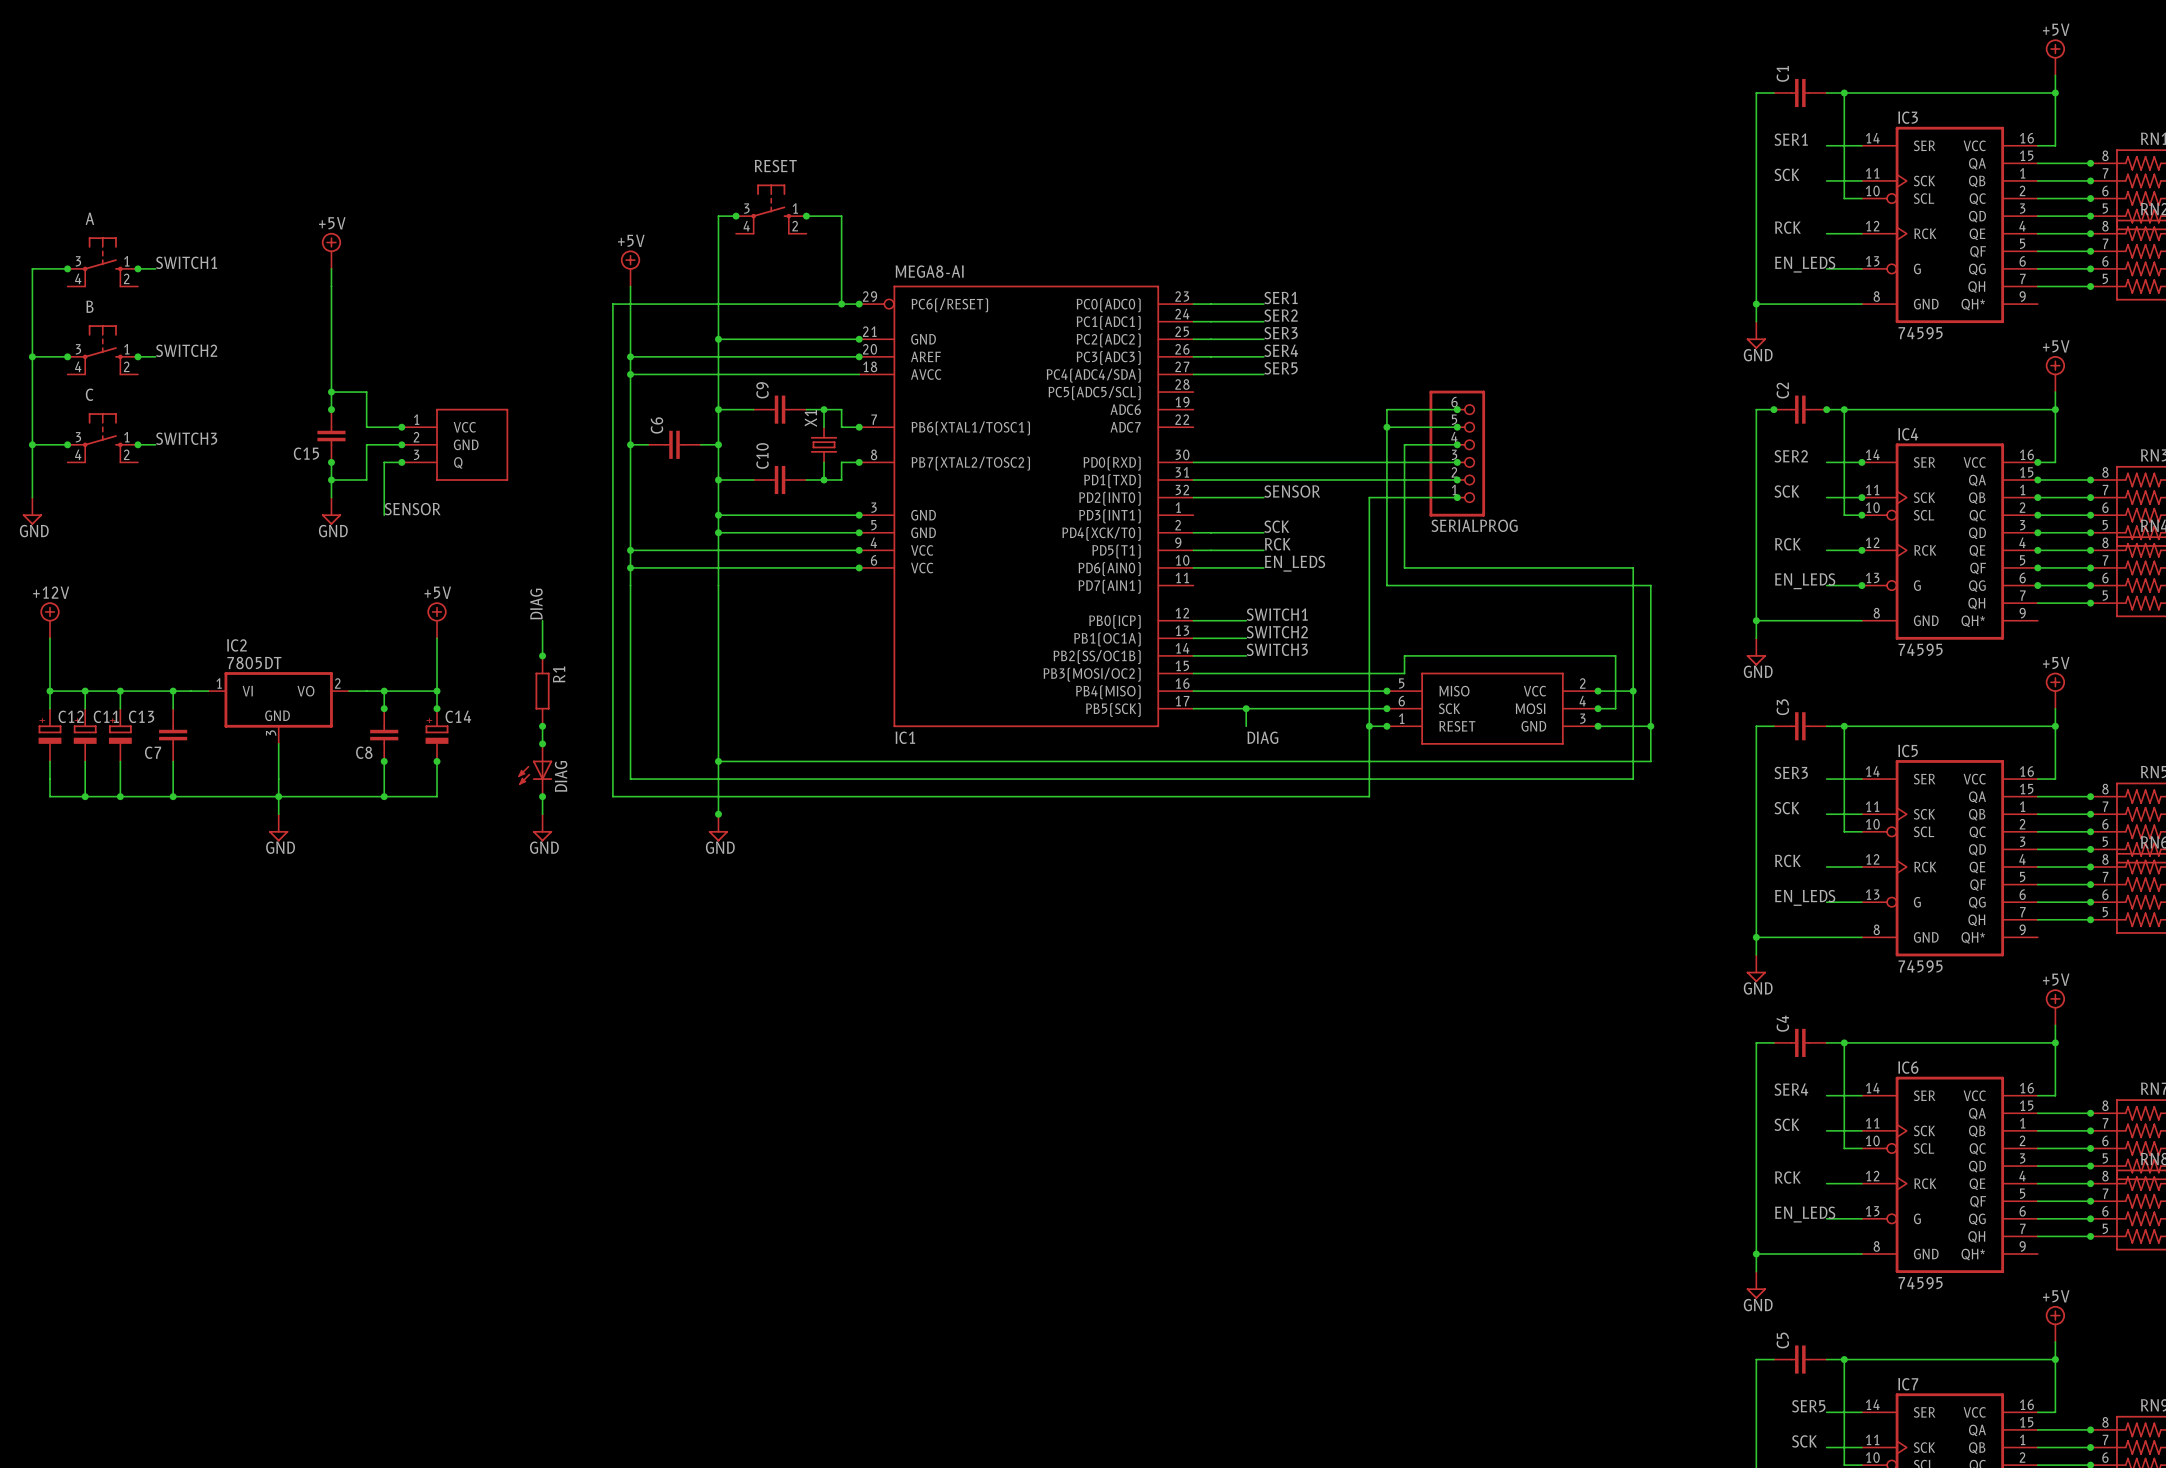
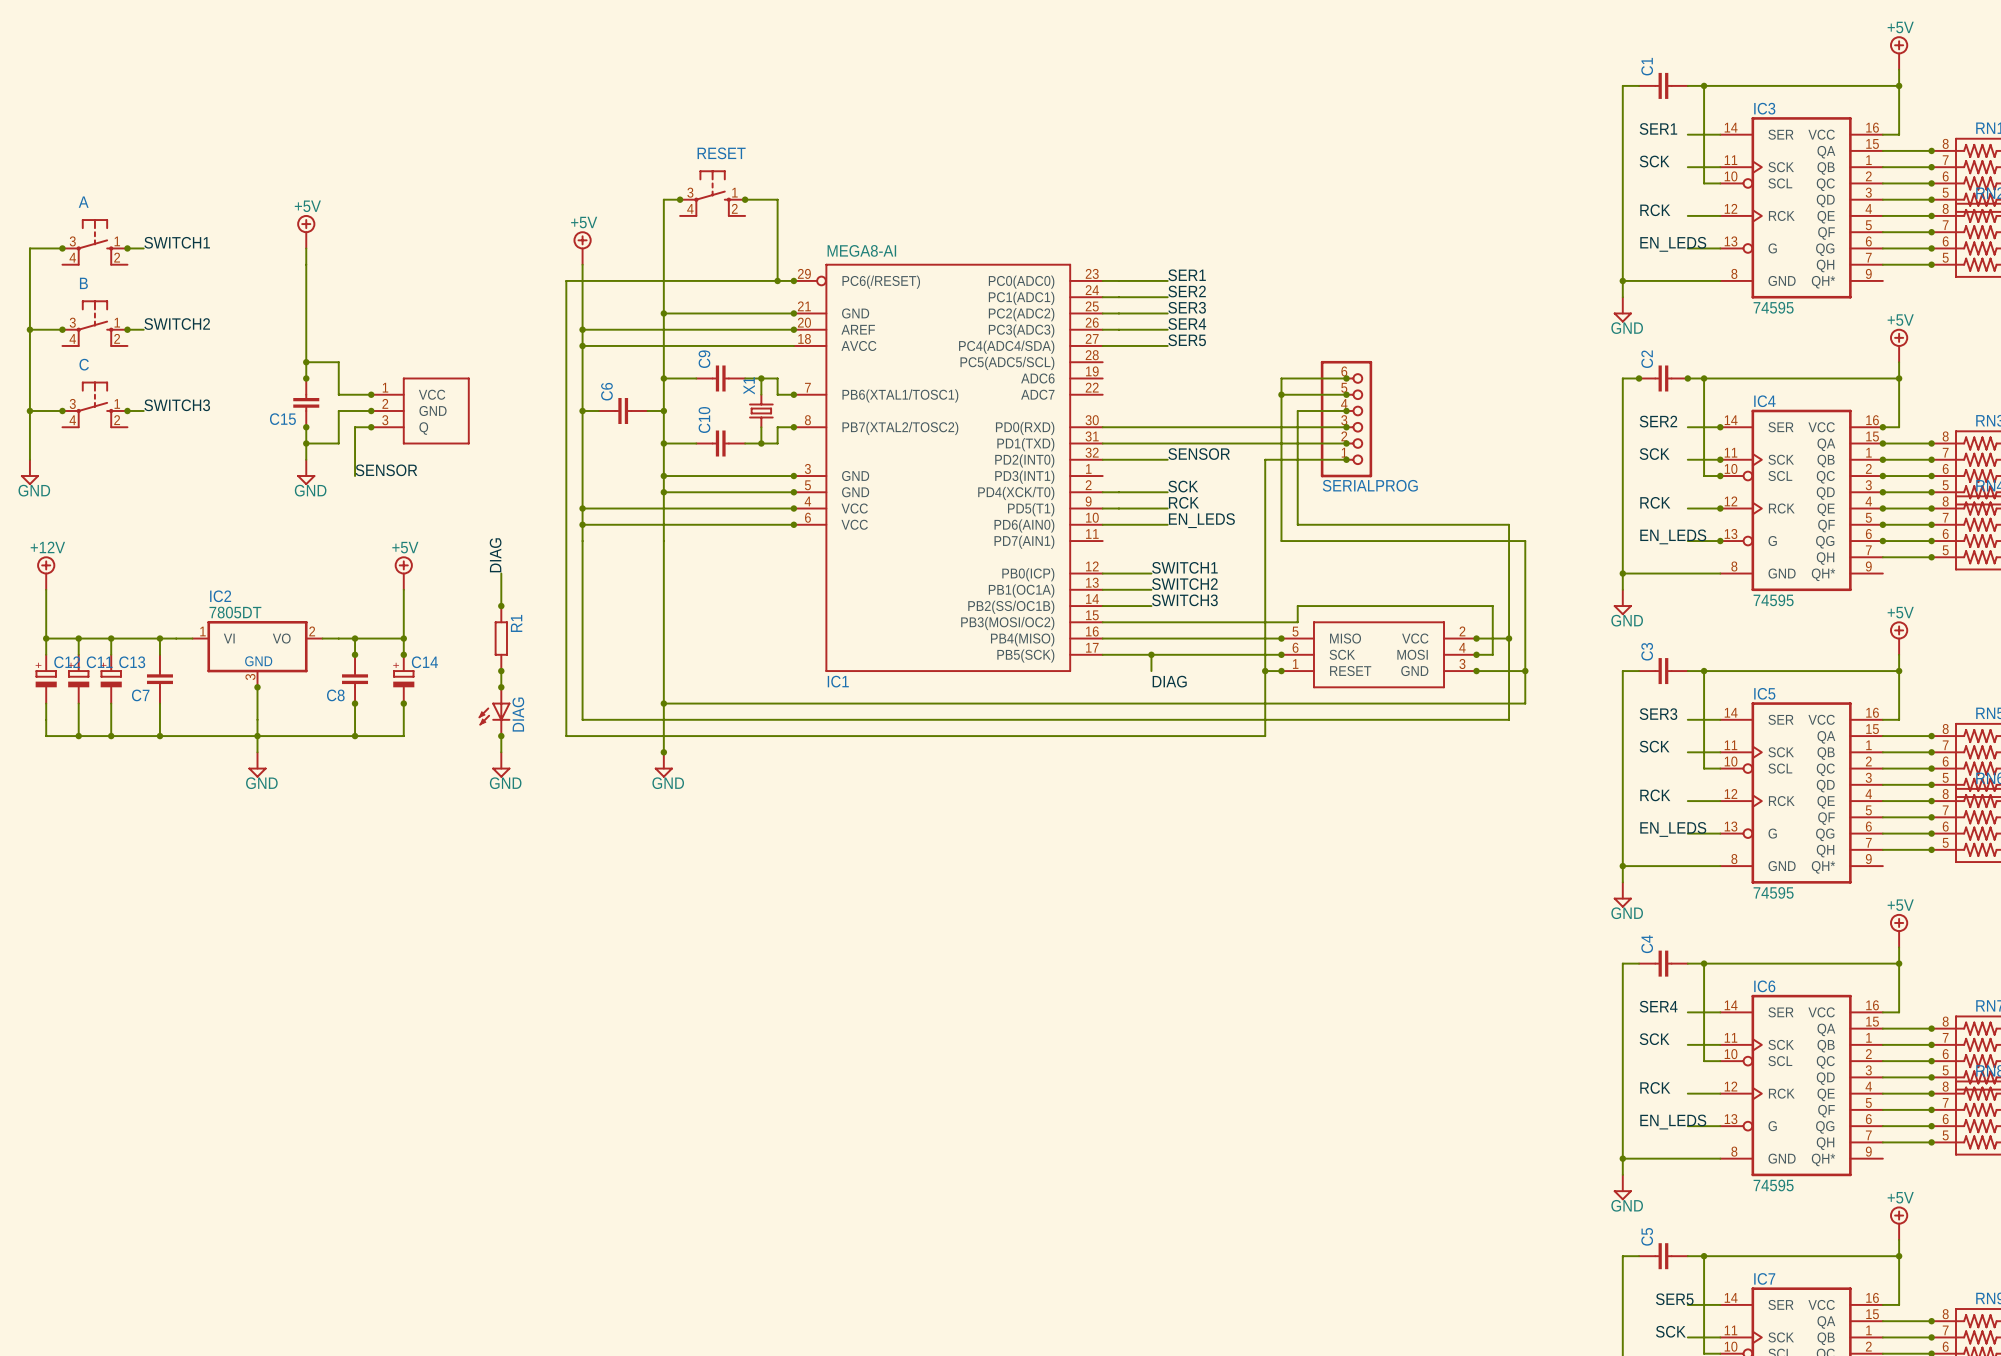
junction: none -> (257, 687)

